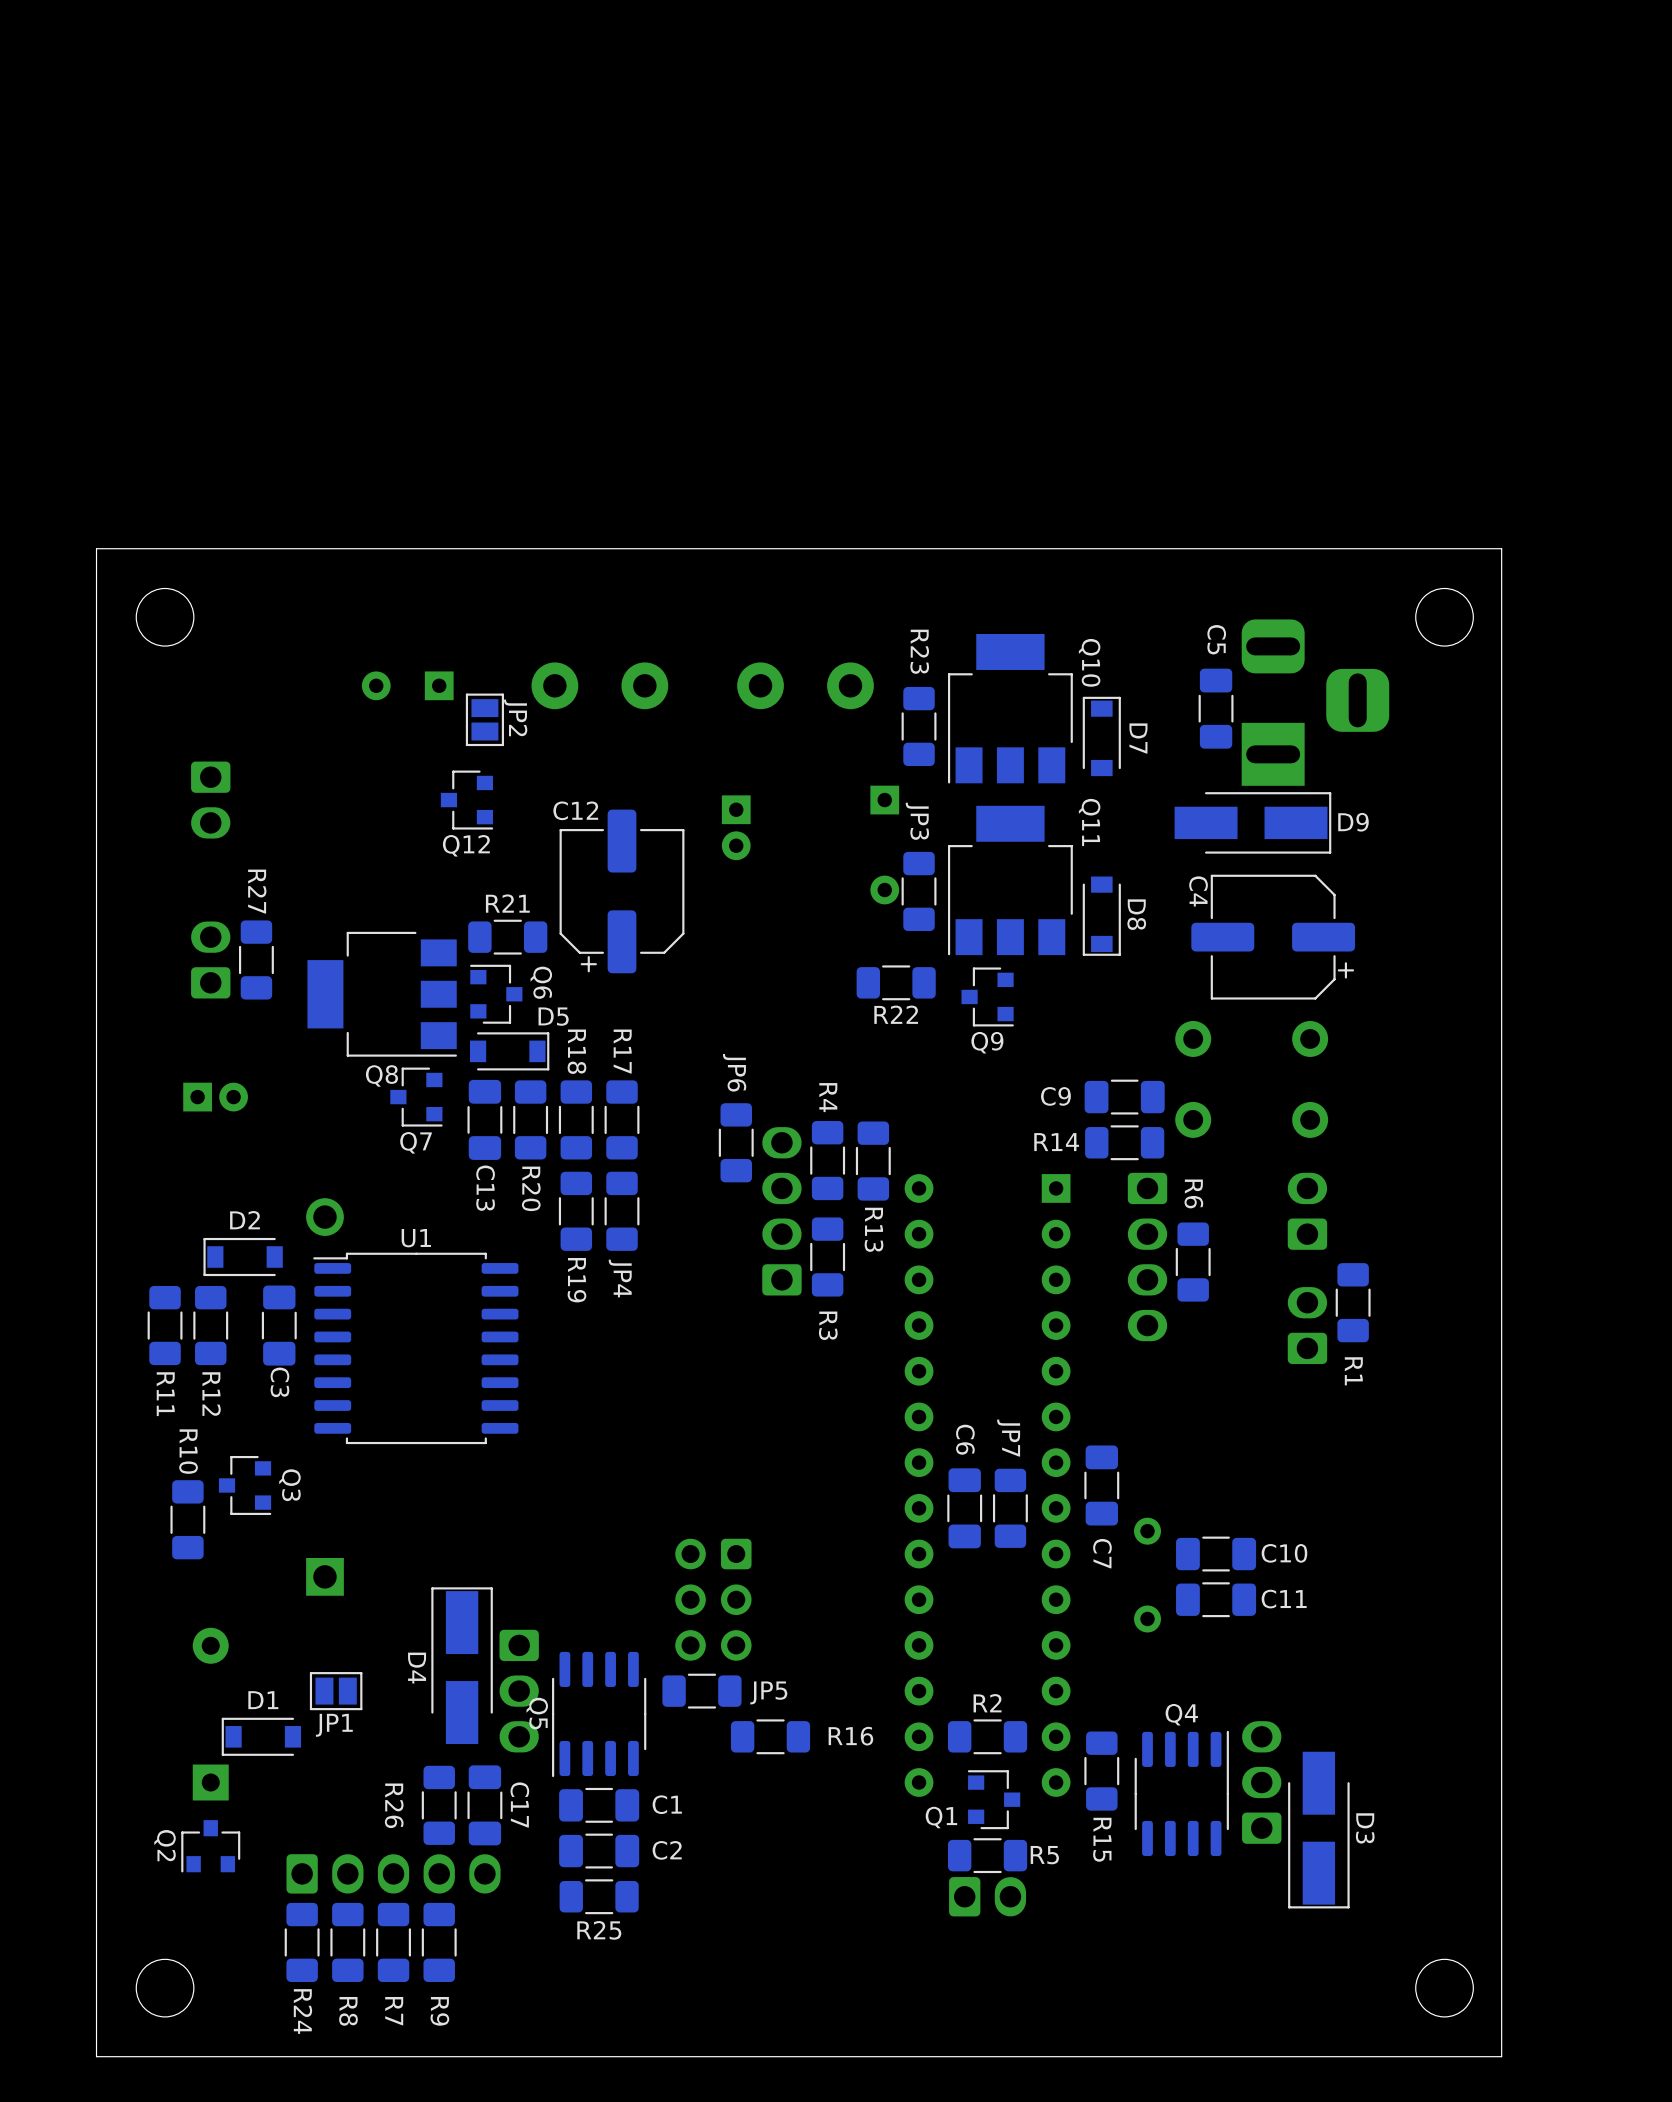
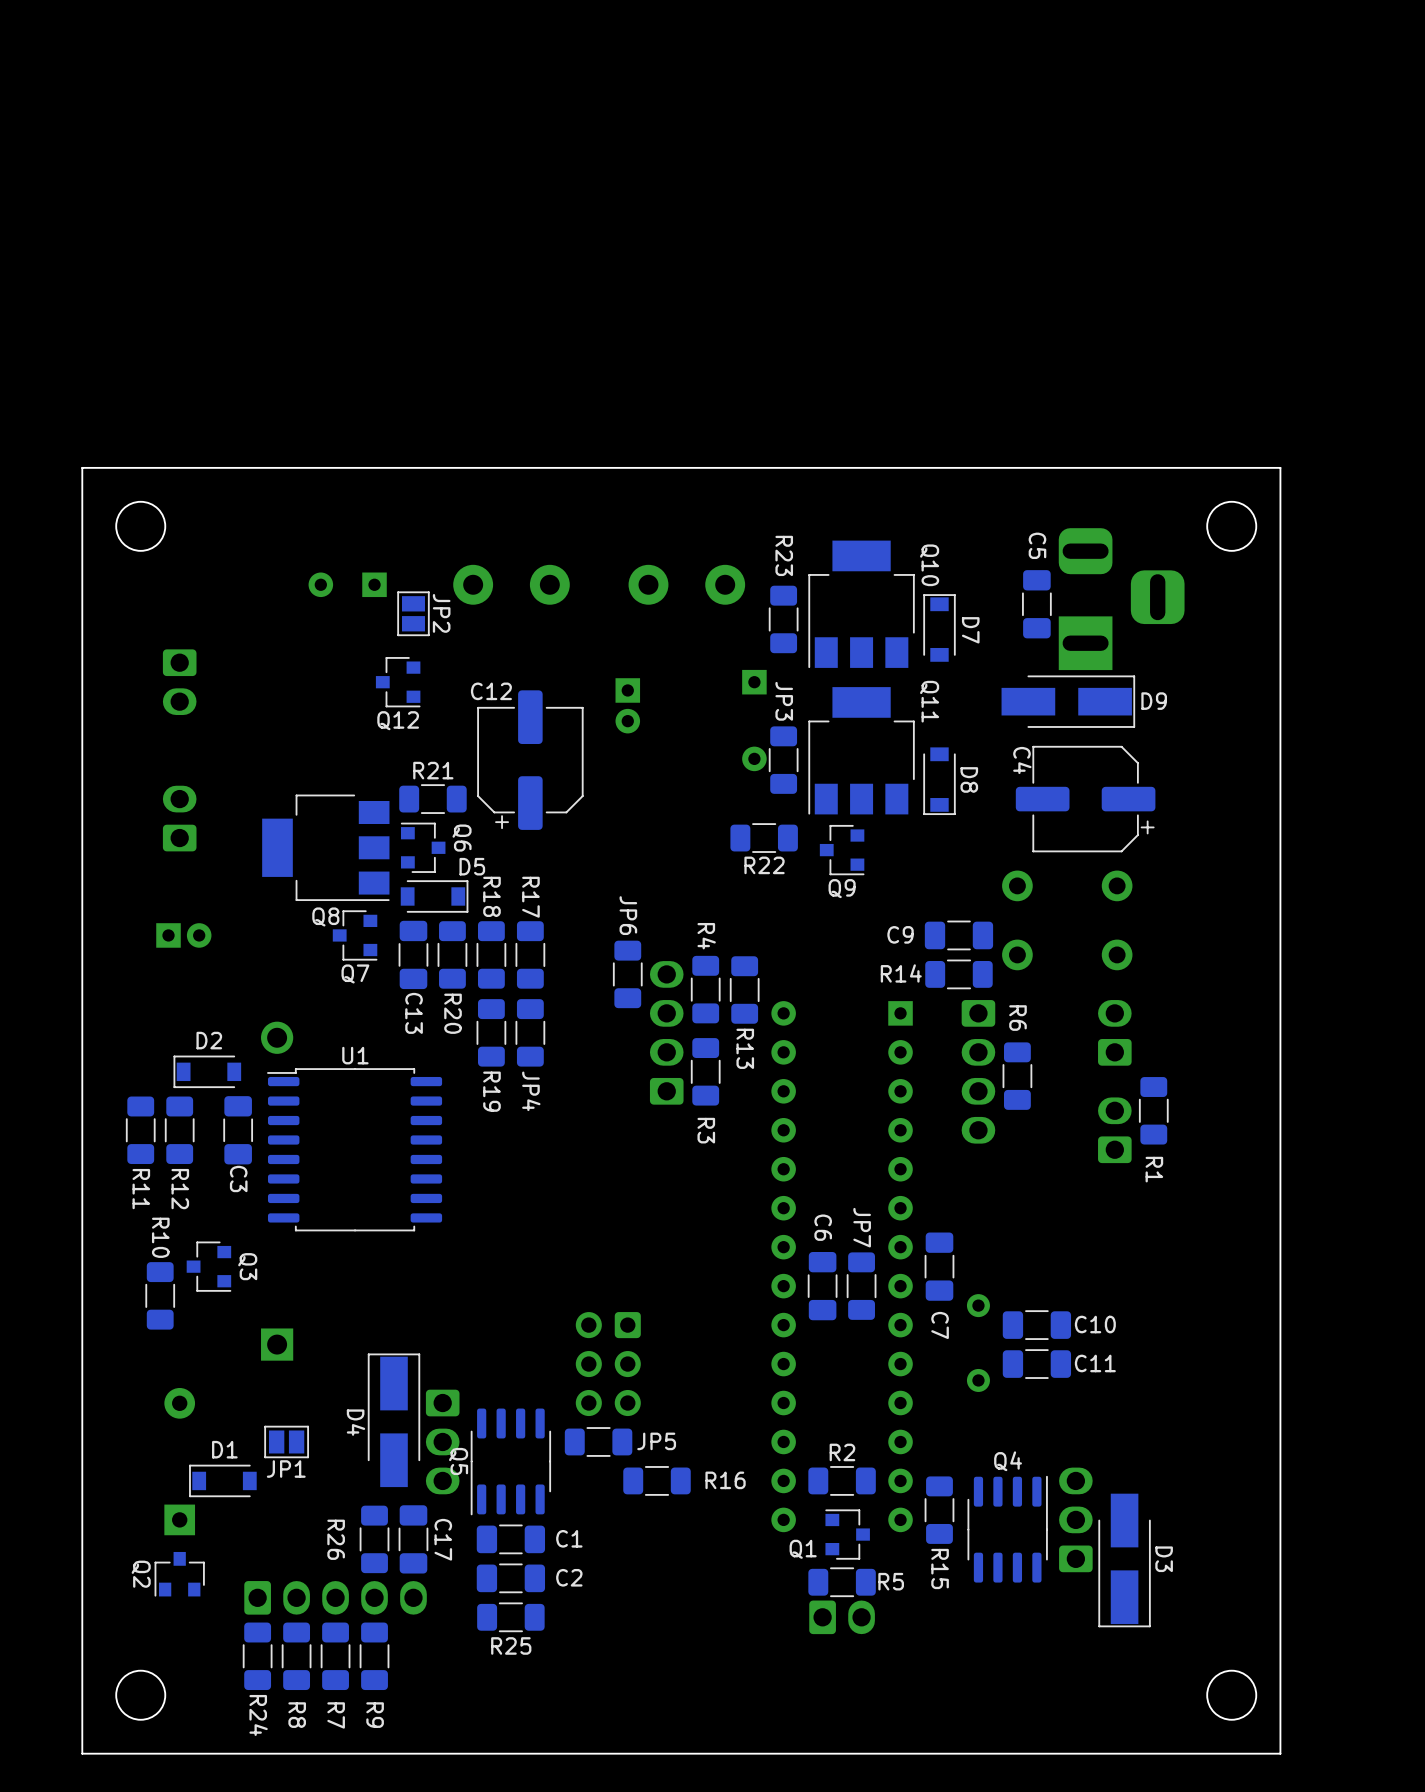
R27: (256, 959) -> none

